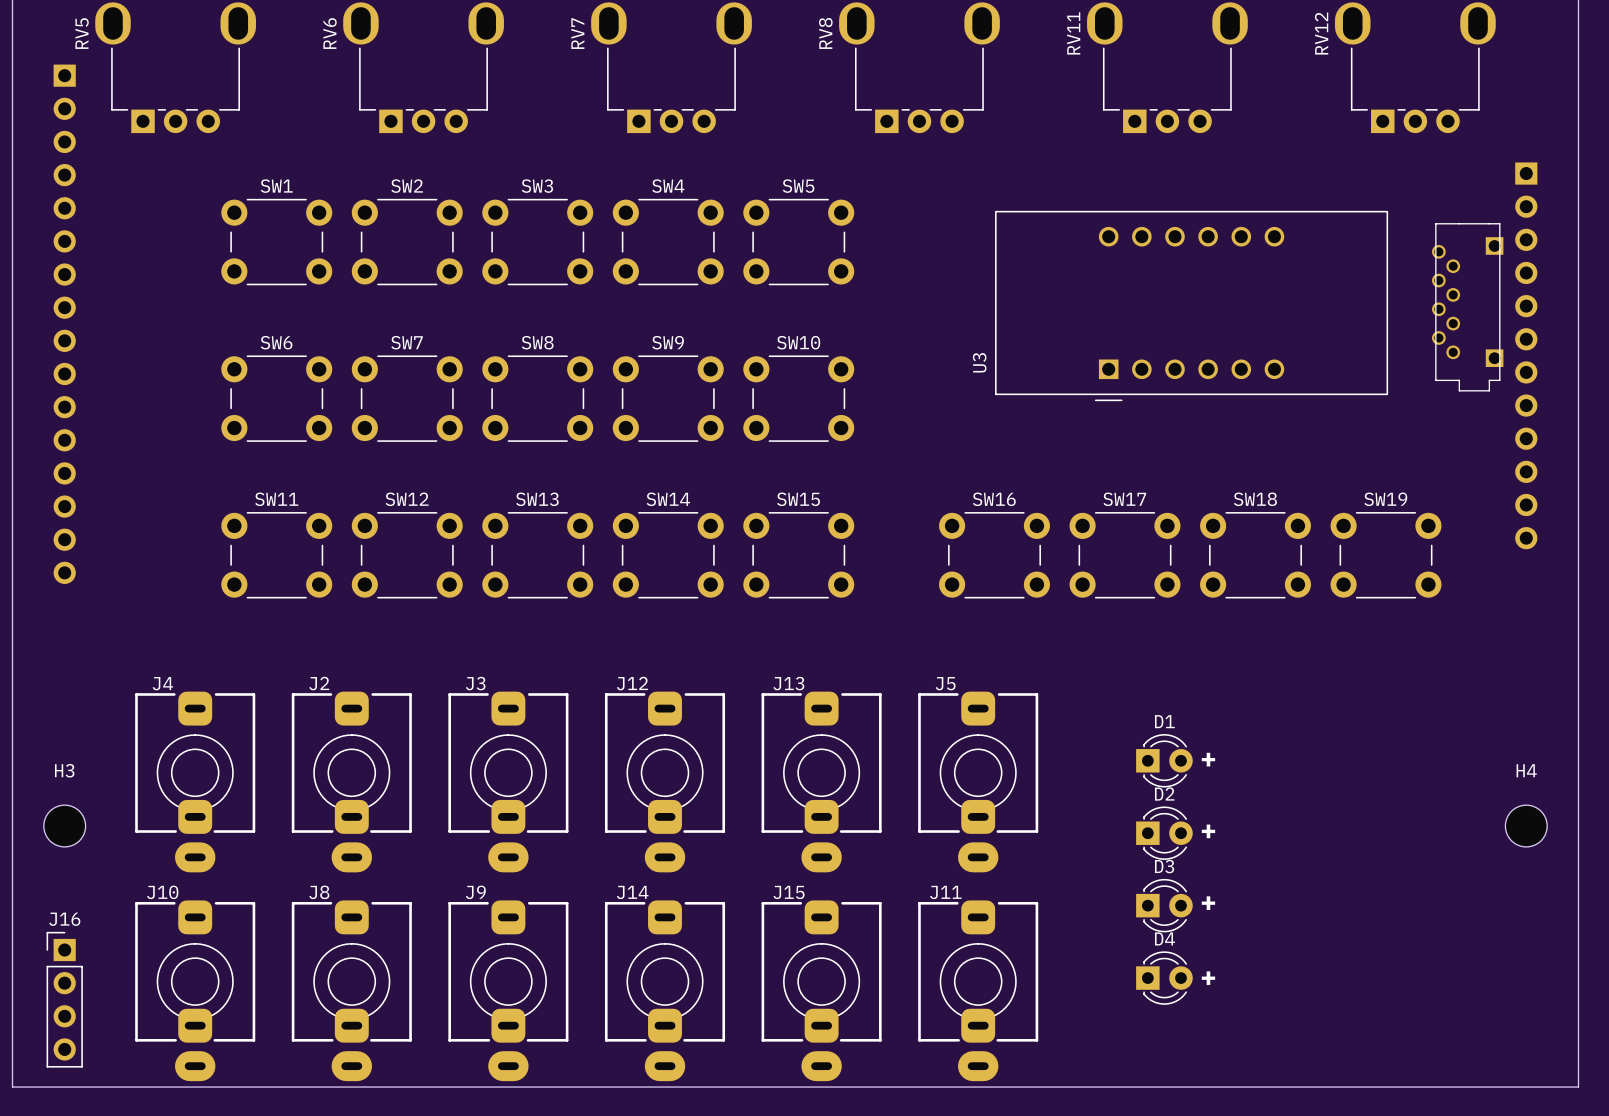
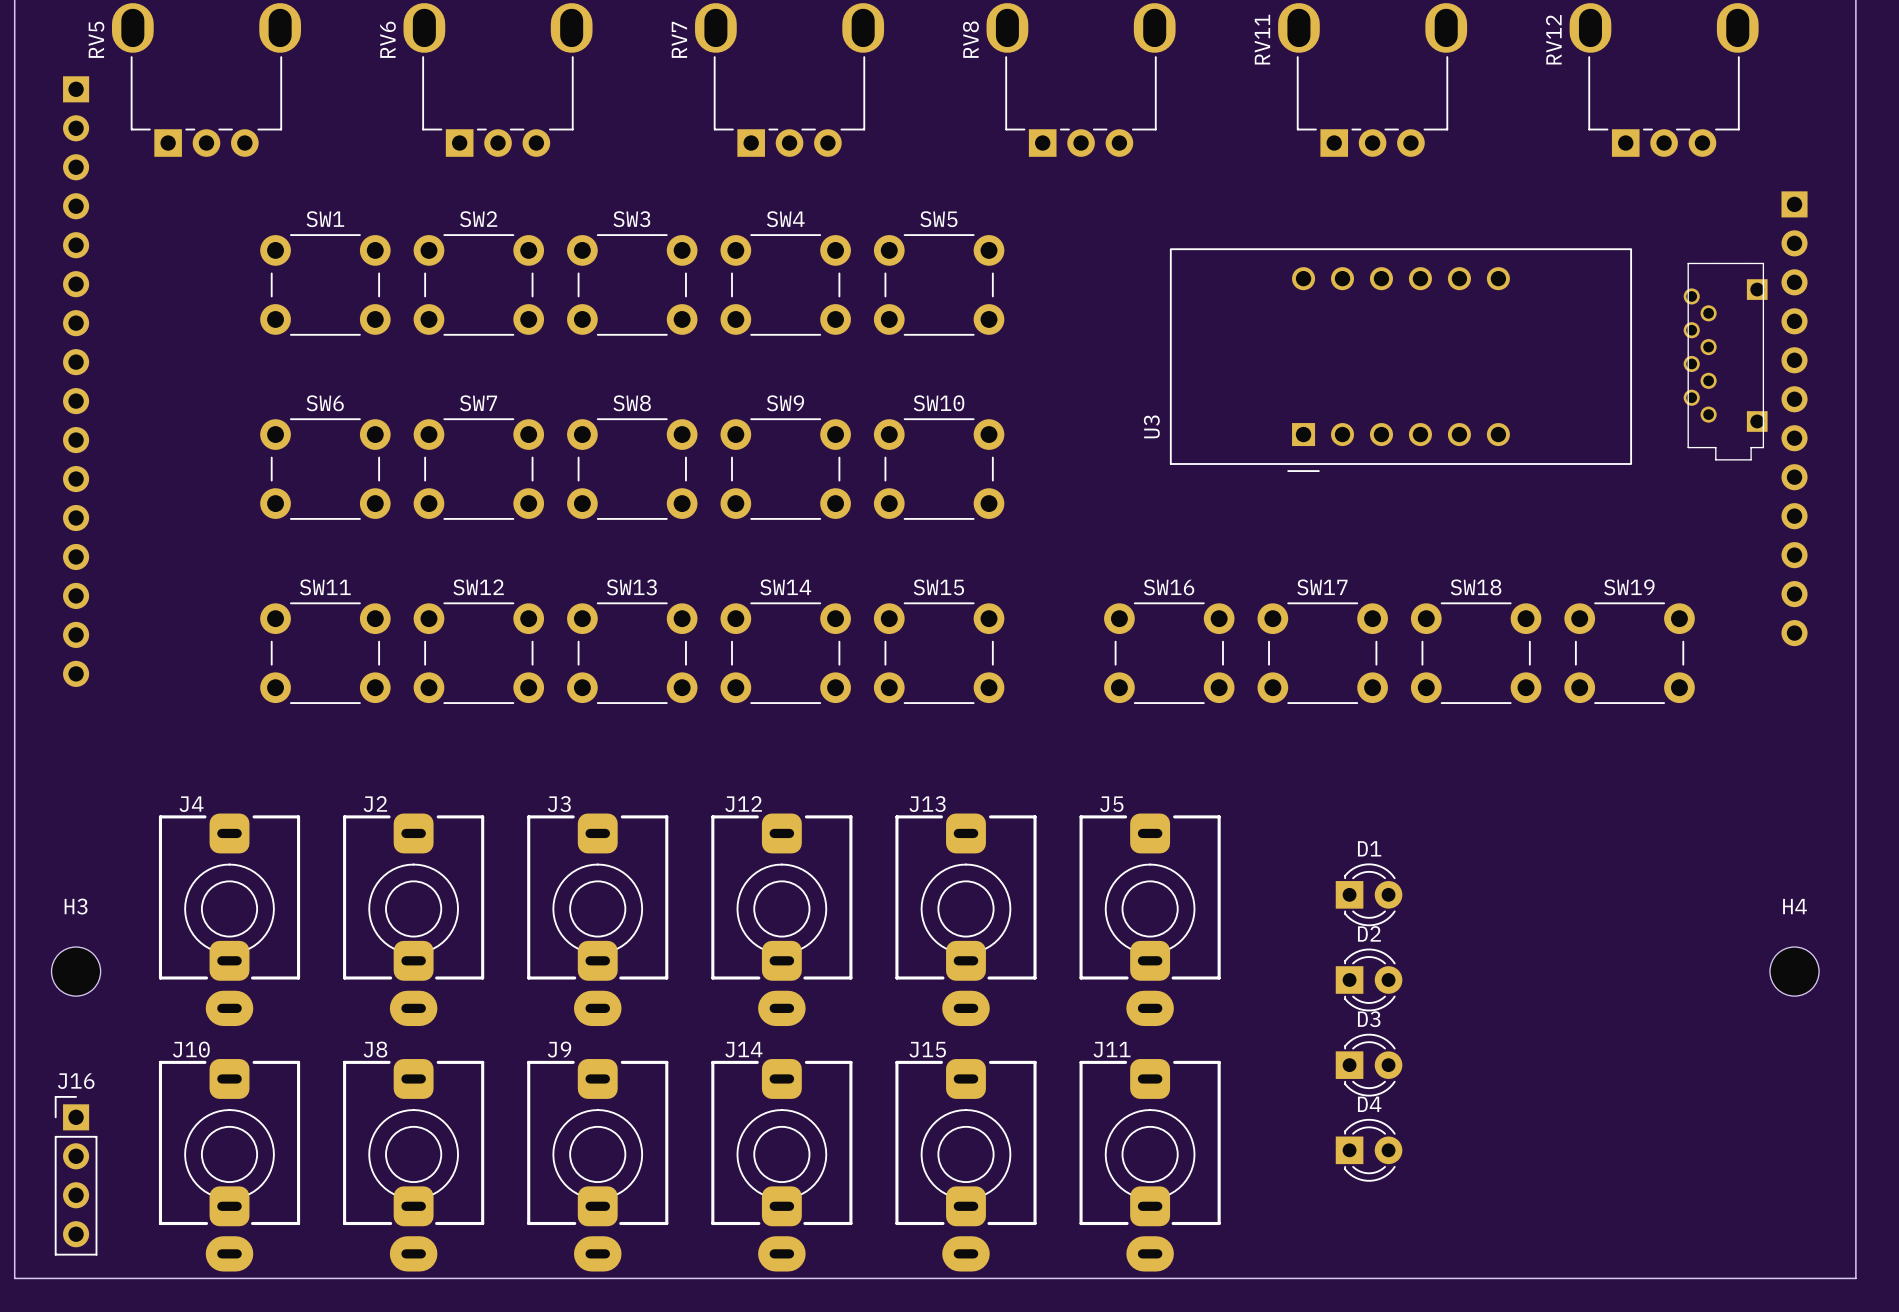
text: + (1208, 759) -> none
text: + (1208, 831) -> none
text: + (1208, 903) -> none
text: + (1208, 978) -> none

